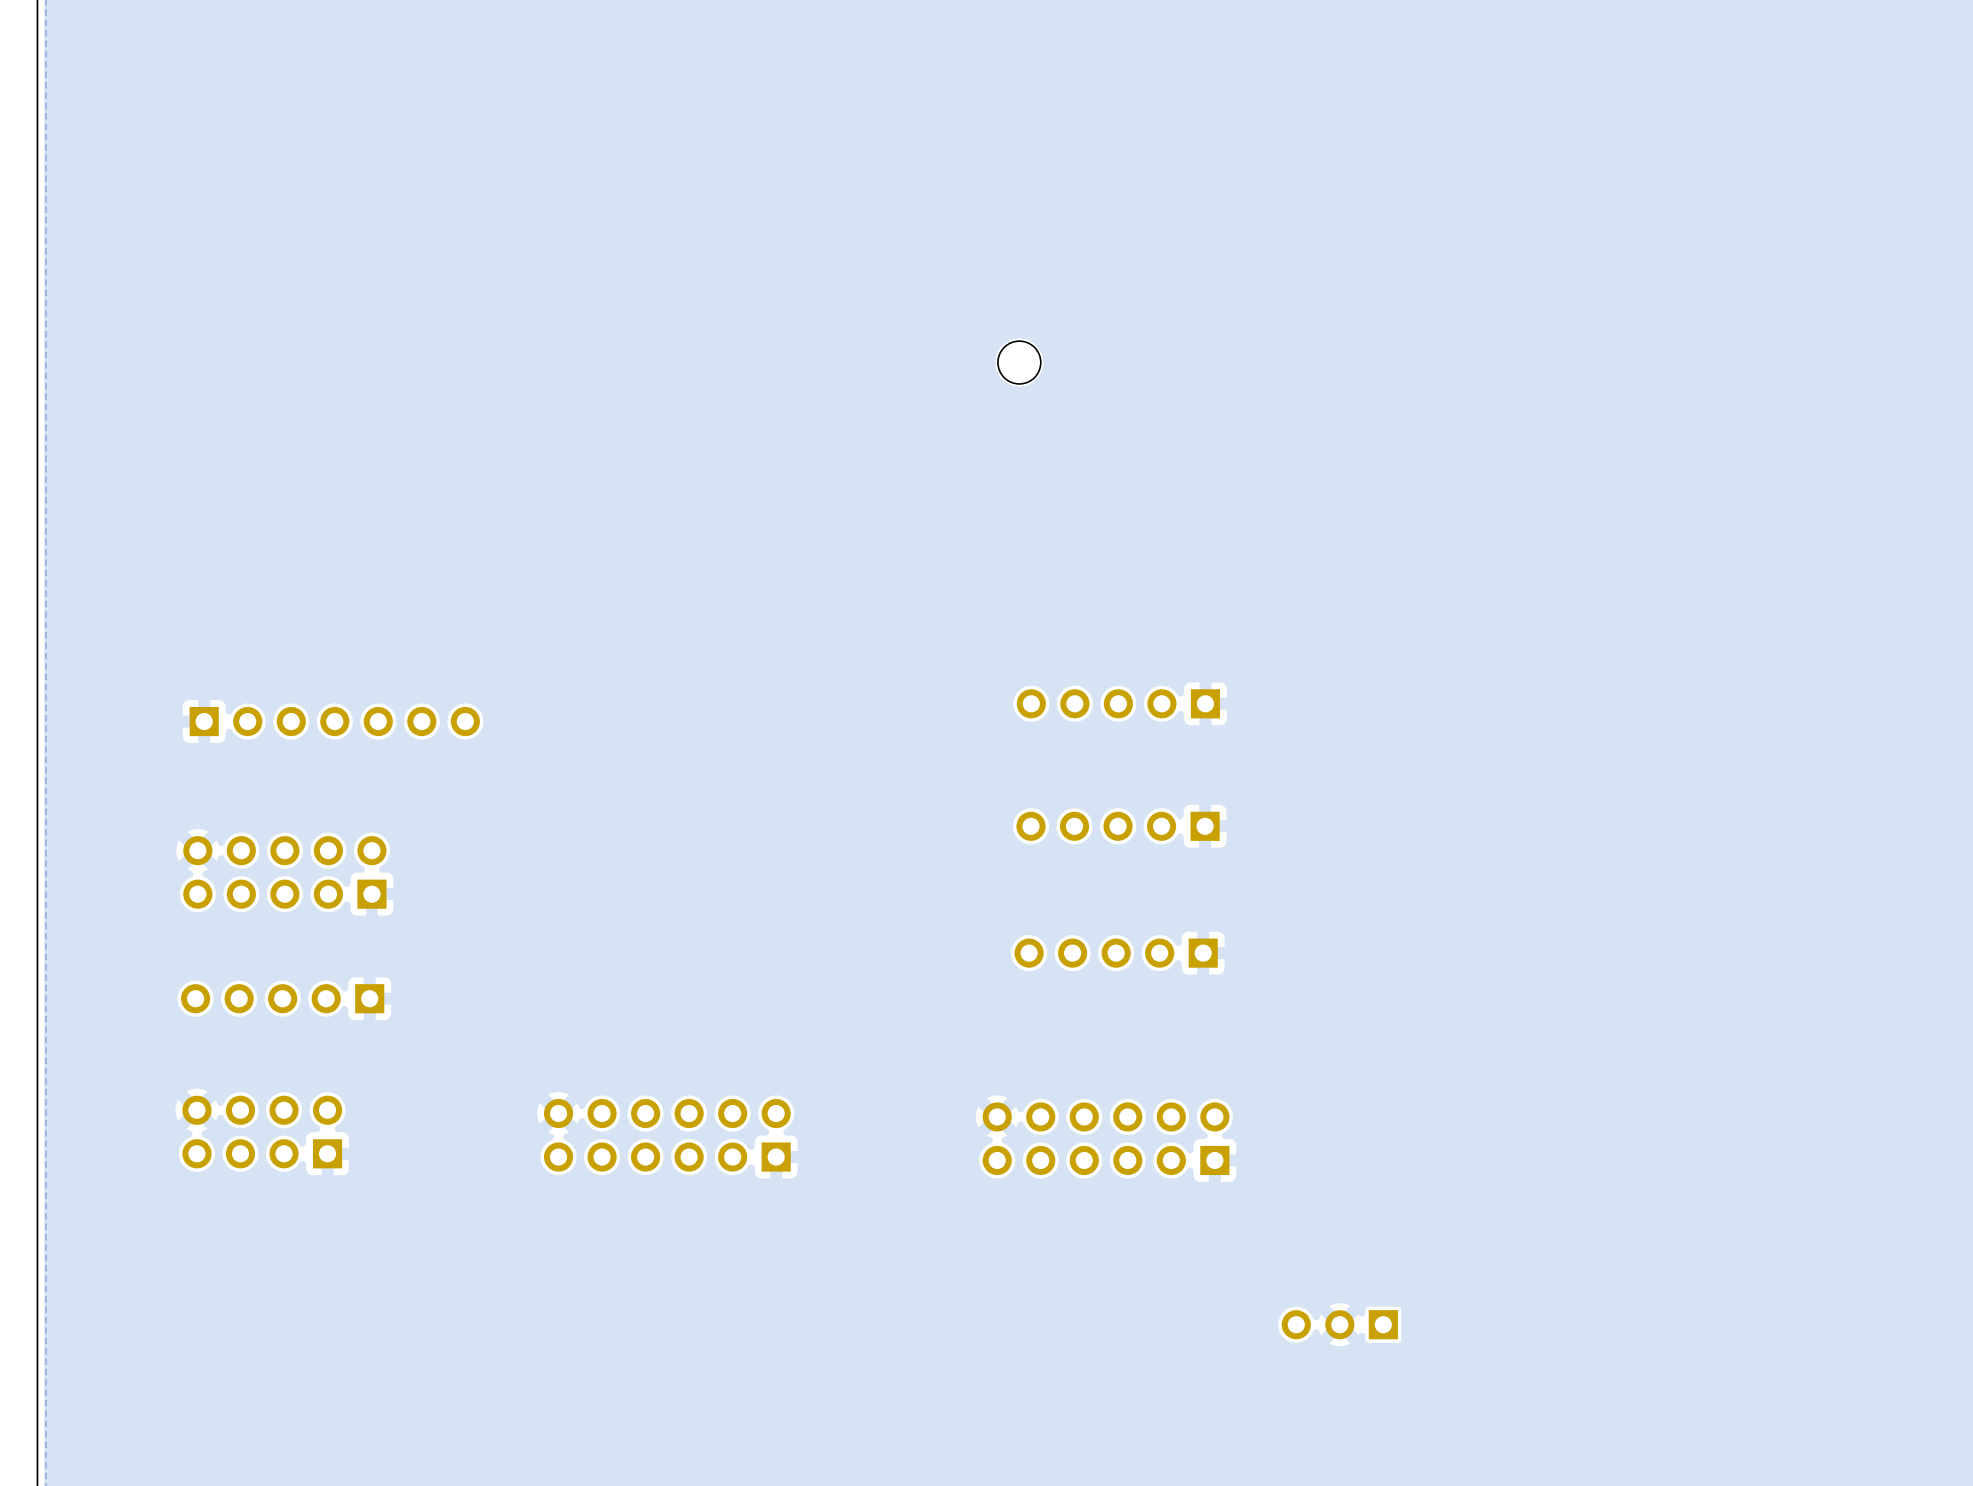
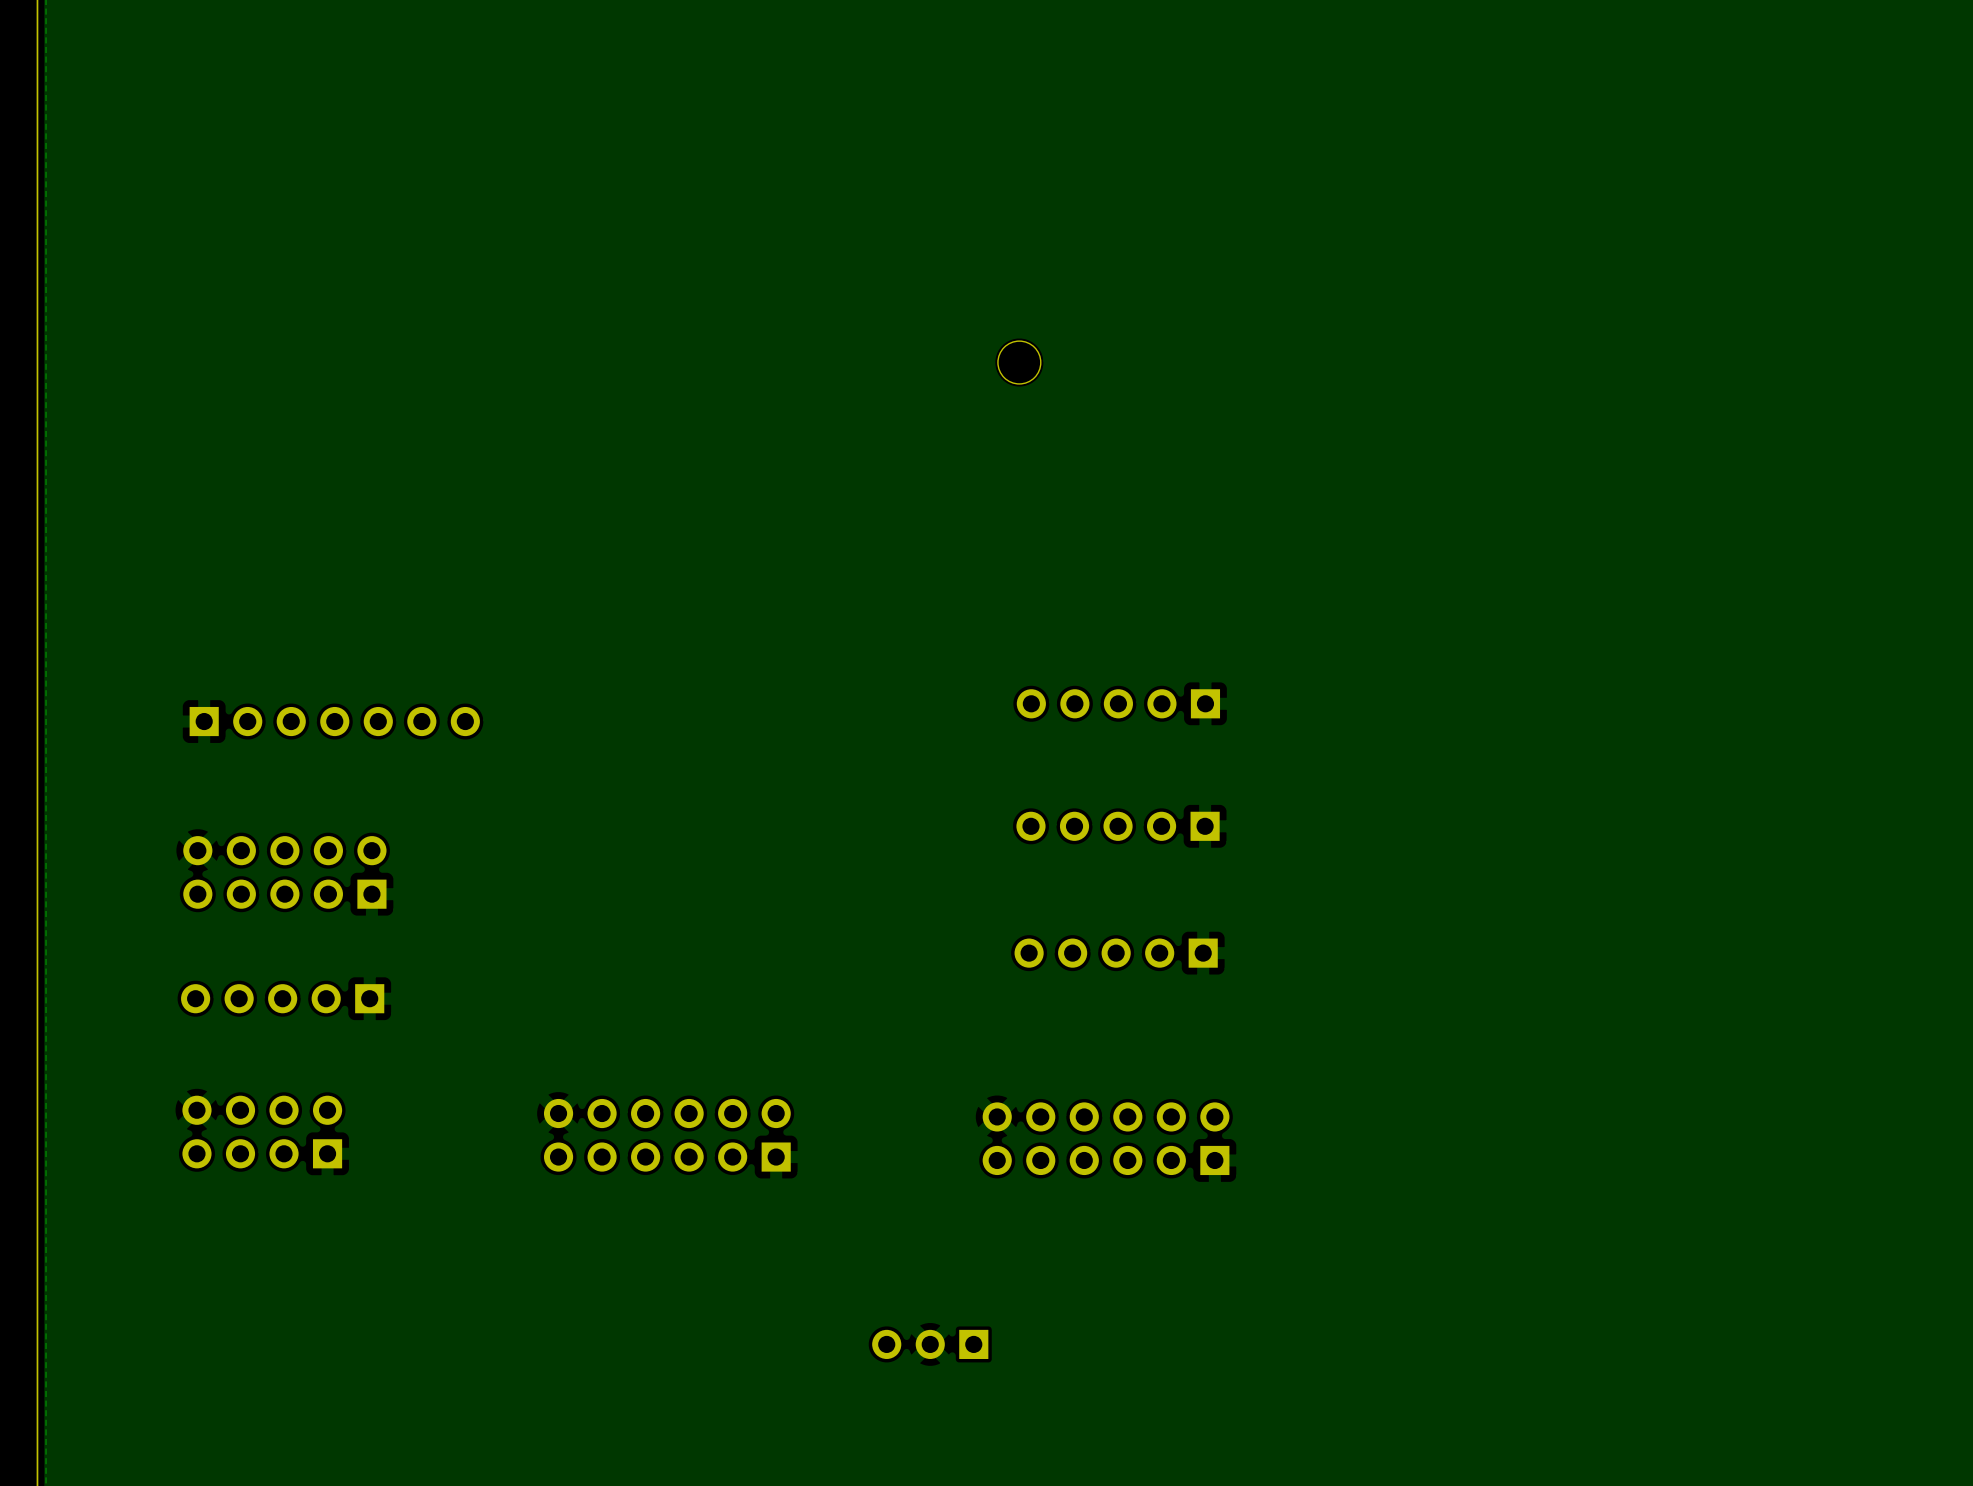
part position: (1339, 1324) -> (930, 1344)

